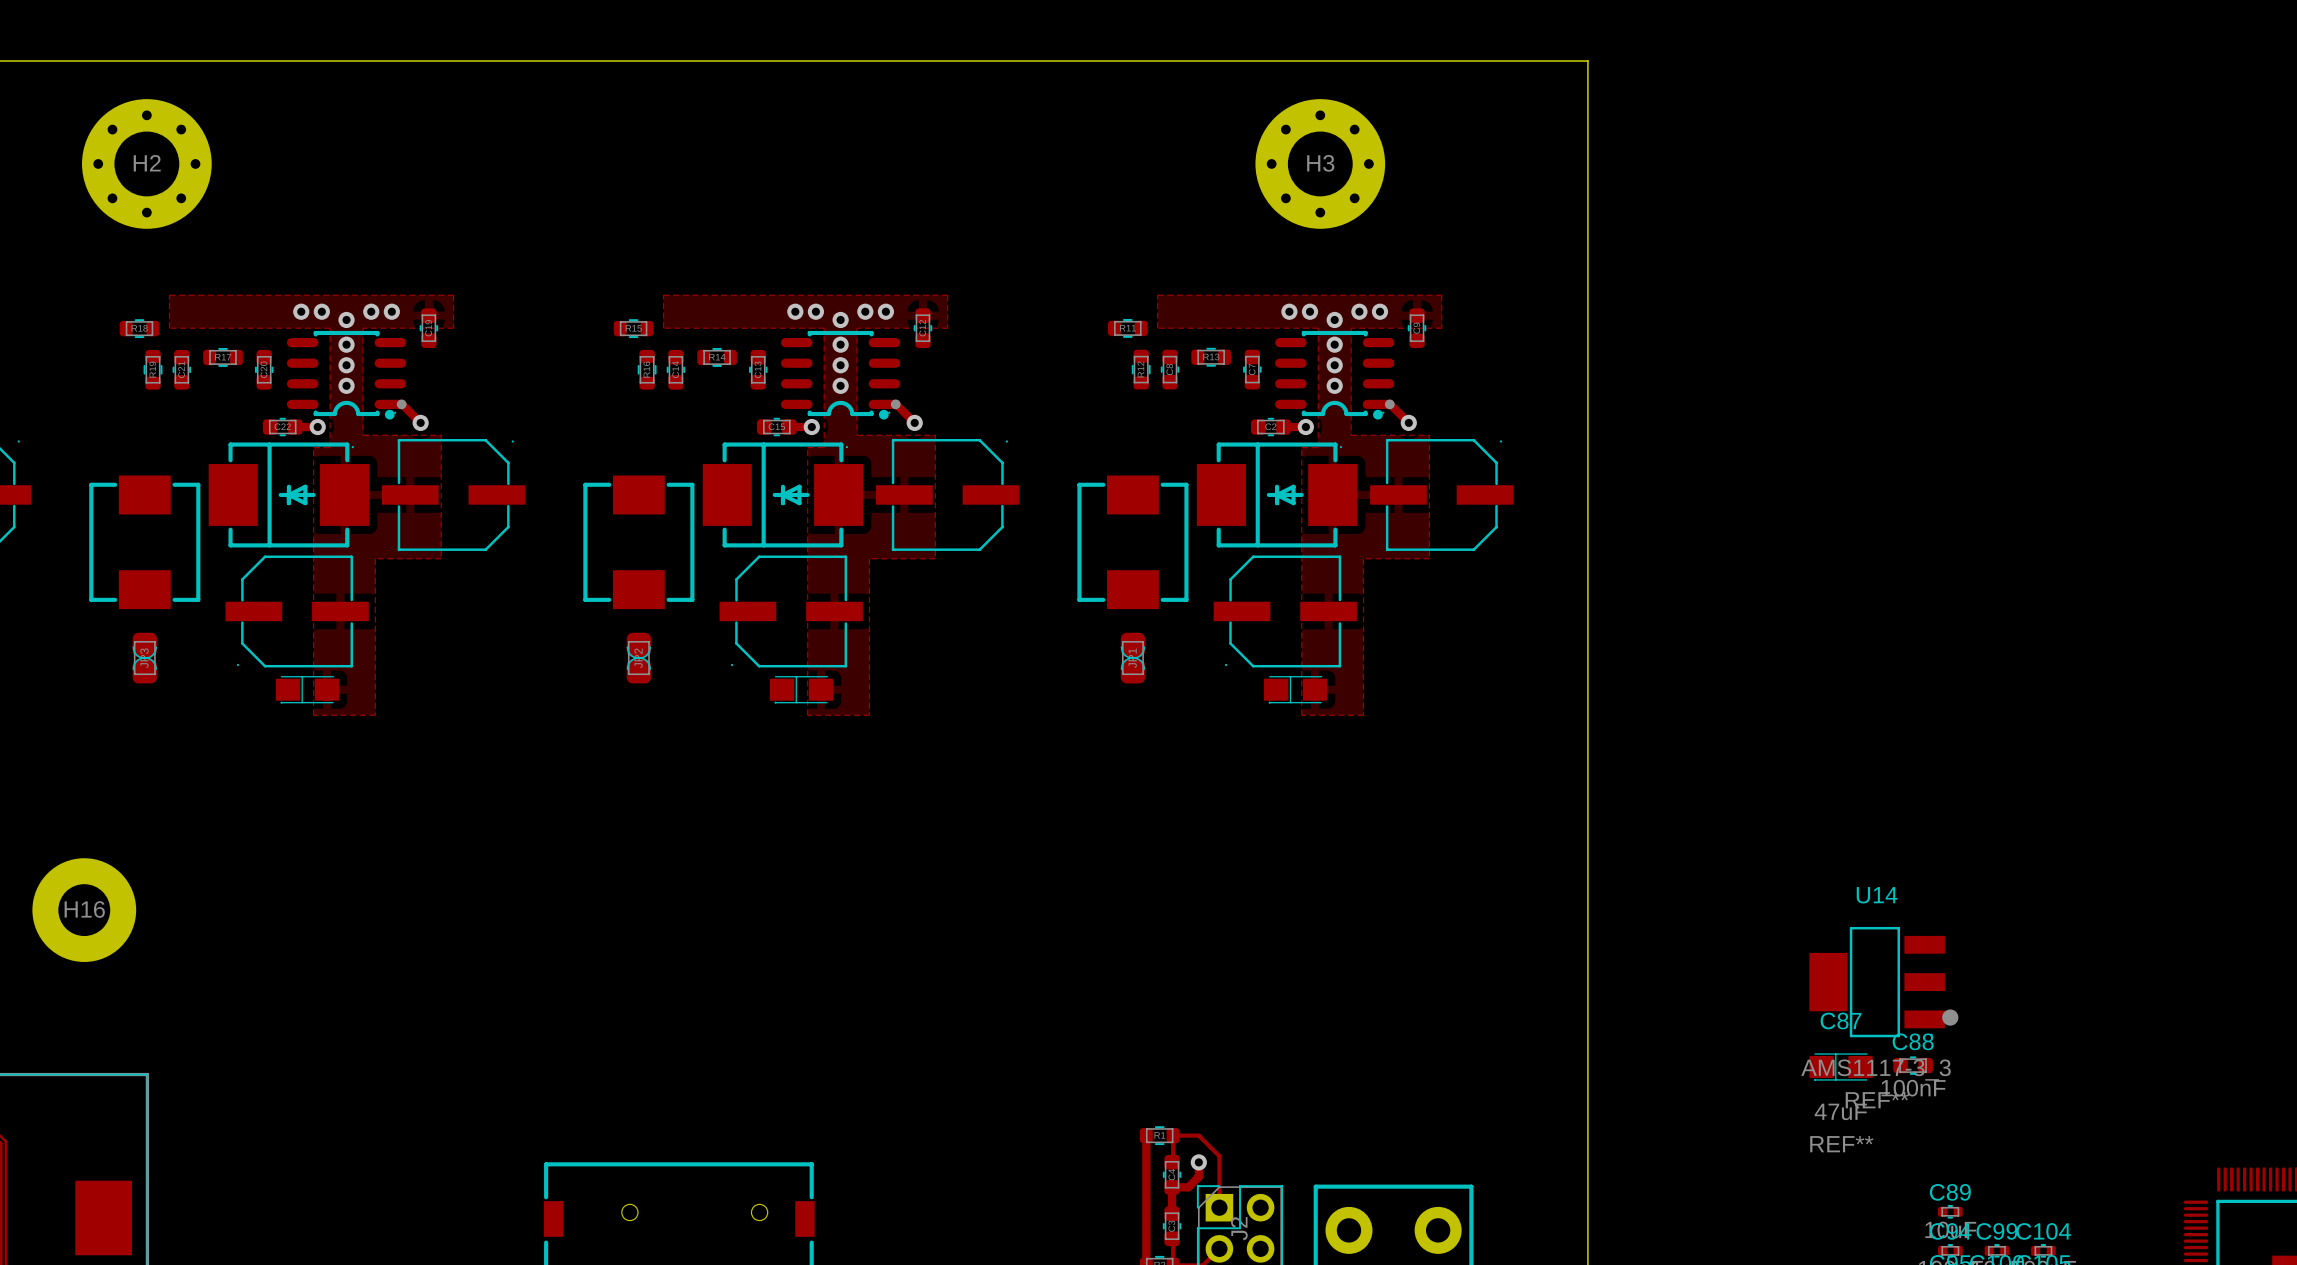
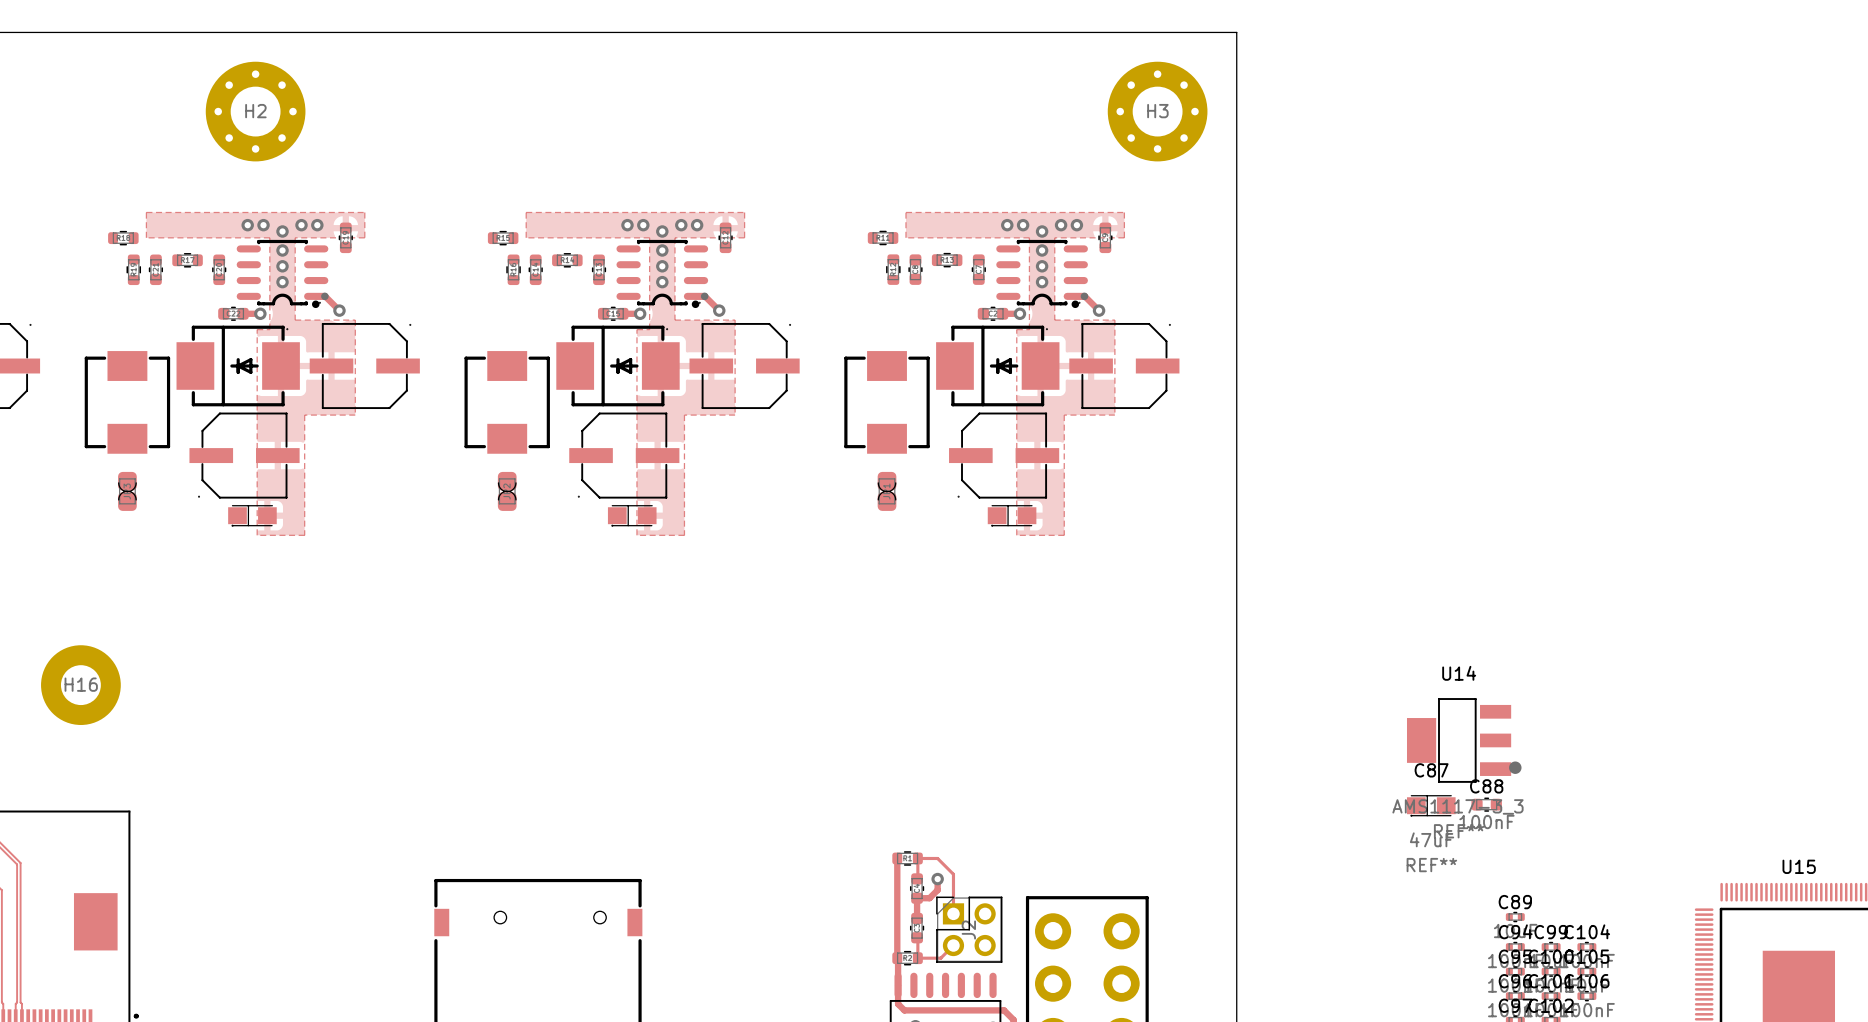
H2 position: (146, 163) -> (255, 111)
H3 position: (1320, 163) -> (1157, 111)

